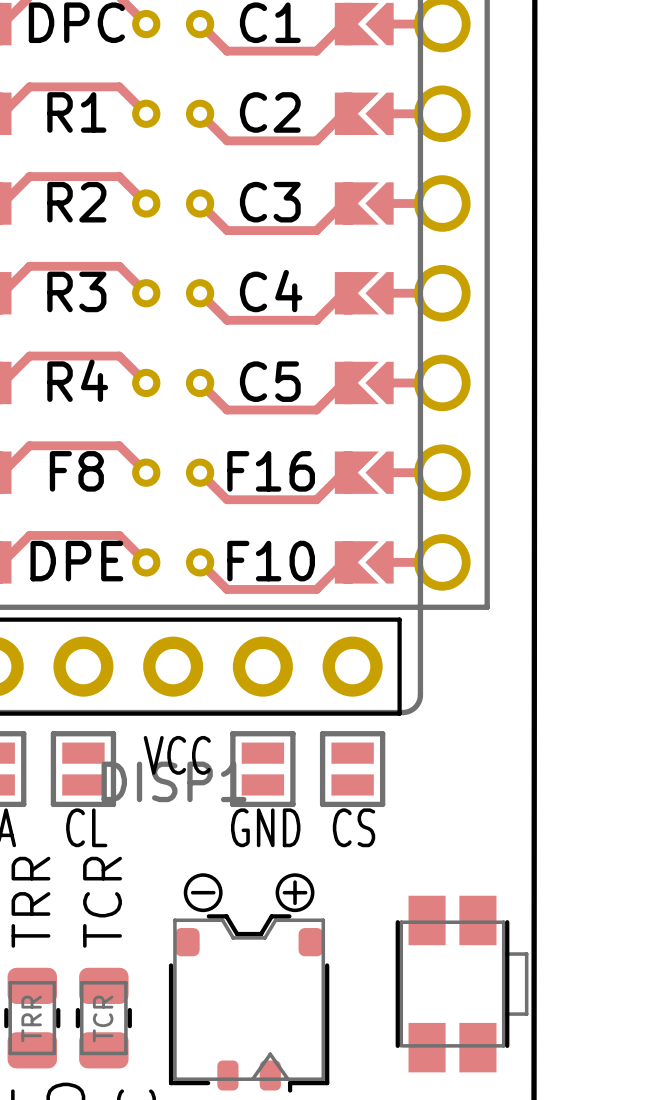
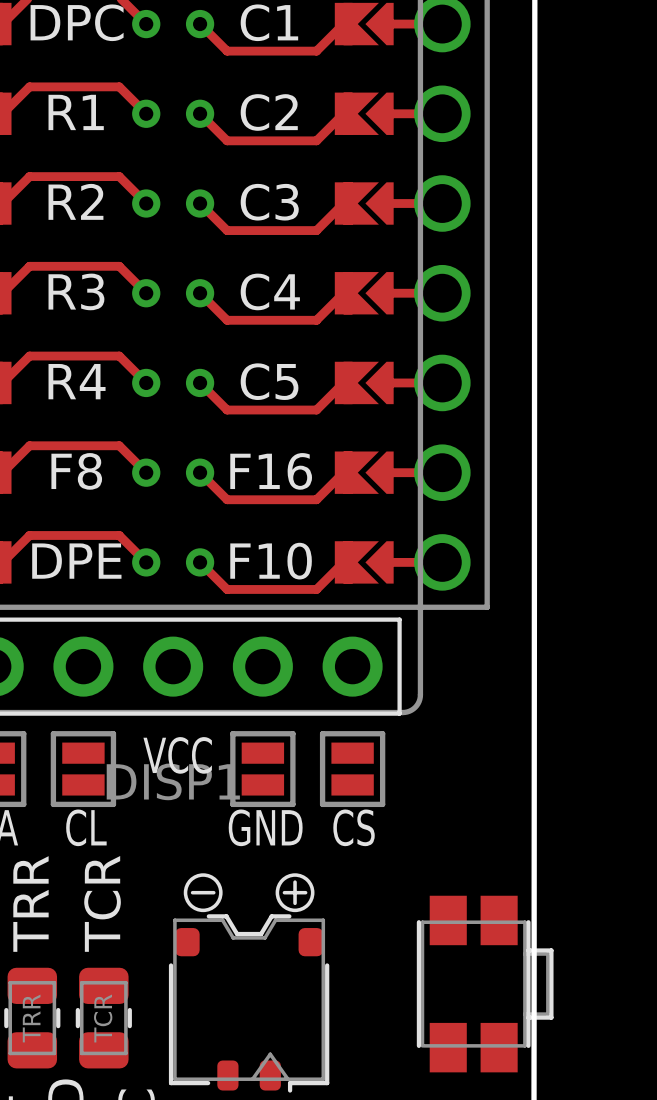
part footprint: [395, 895, 529, 1073] -> [416, 895, 554, 1073]

